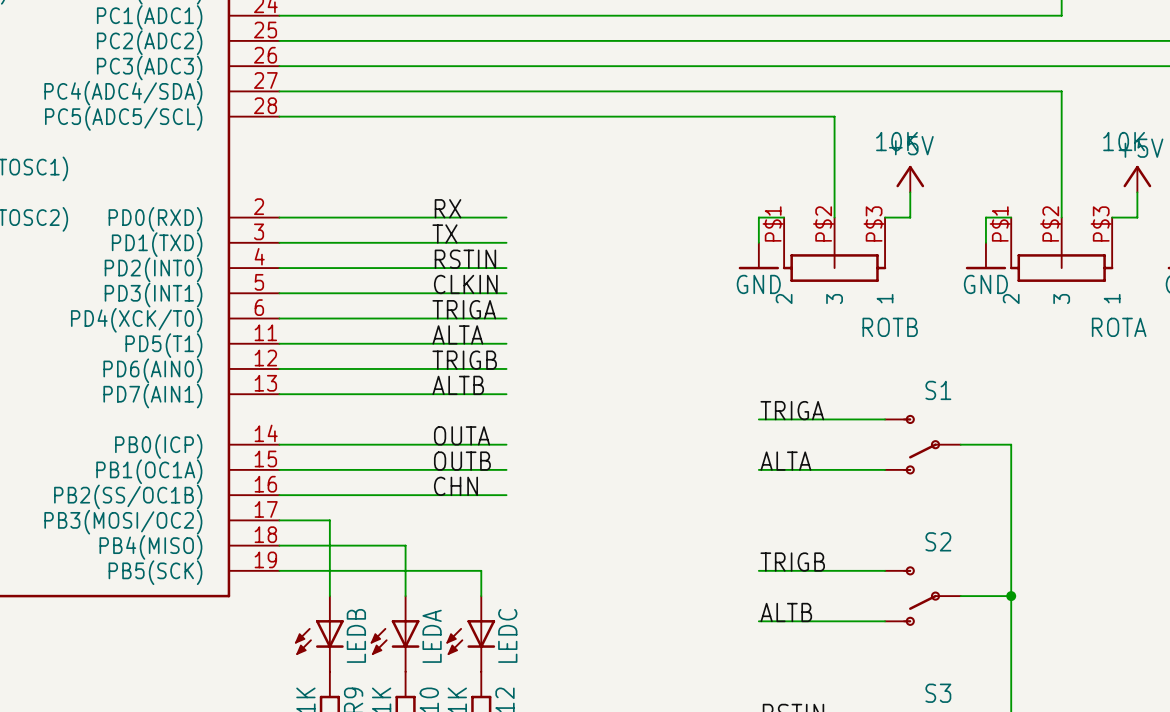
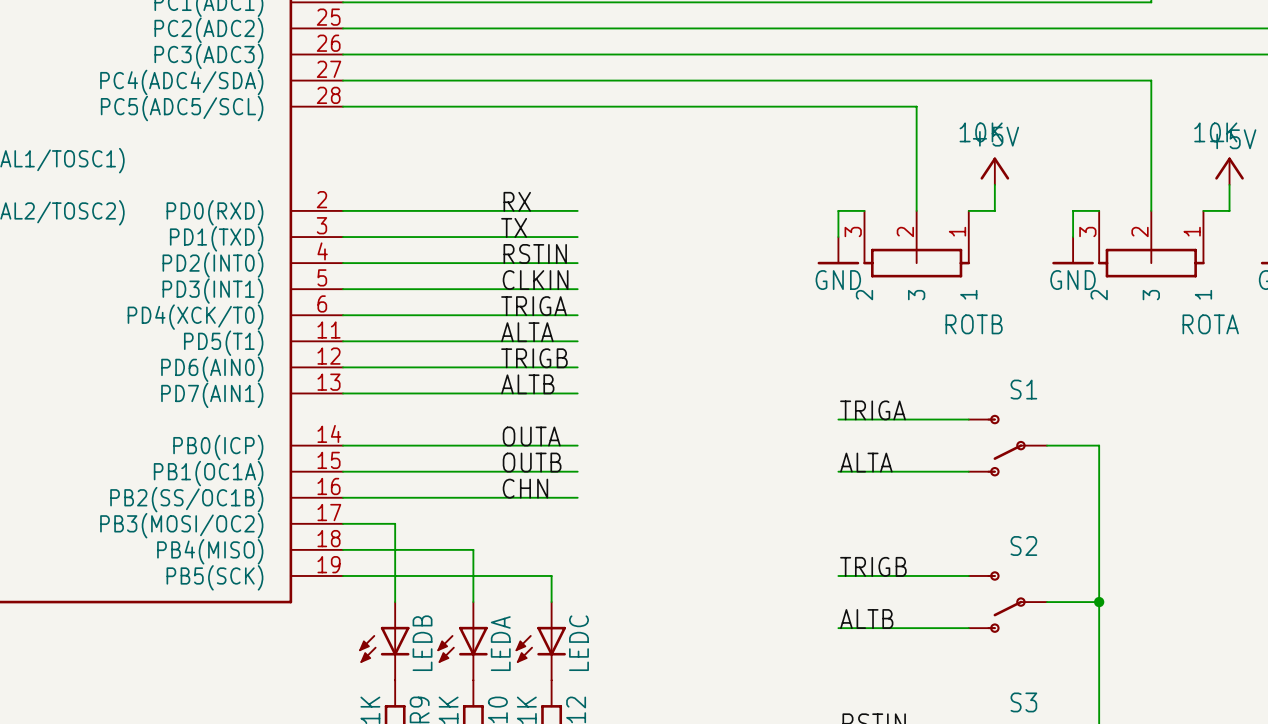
ROTB pin number: P$1 (773, 223) -> 3 (853, 231)
ROTB pin number: P$2 (823, 223) -> 2 (905, 231)
ROTB pin number: P$3 (874, 223) -> 1 (957, 231)
ROTA pin number: P$1 (1000, 223) -> 3 (1087, 231)
ROTA pin number: P$2 (1050, 223) -> 2 (1140, 231)
ROTA pin number: P$3 (1101, 223) -> 1 (1192, 231)

